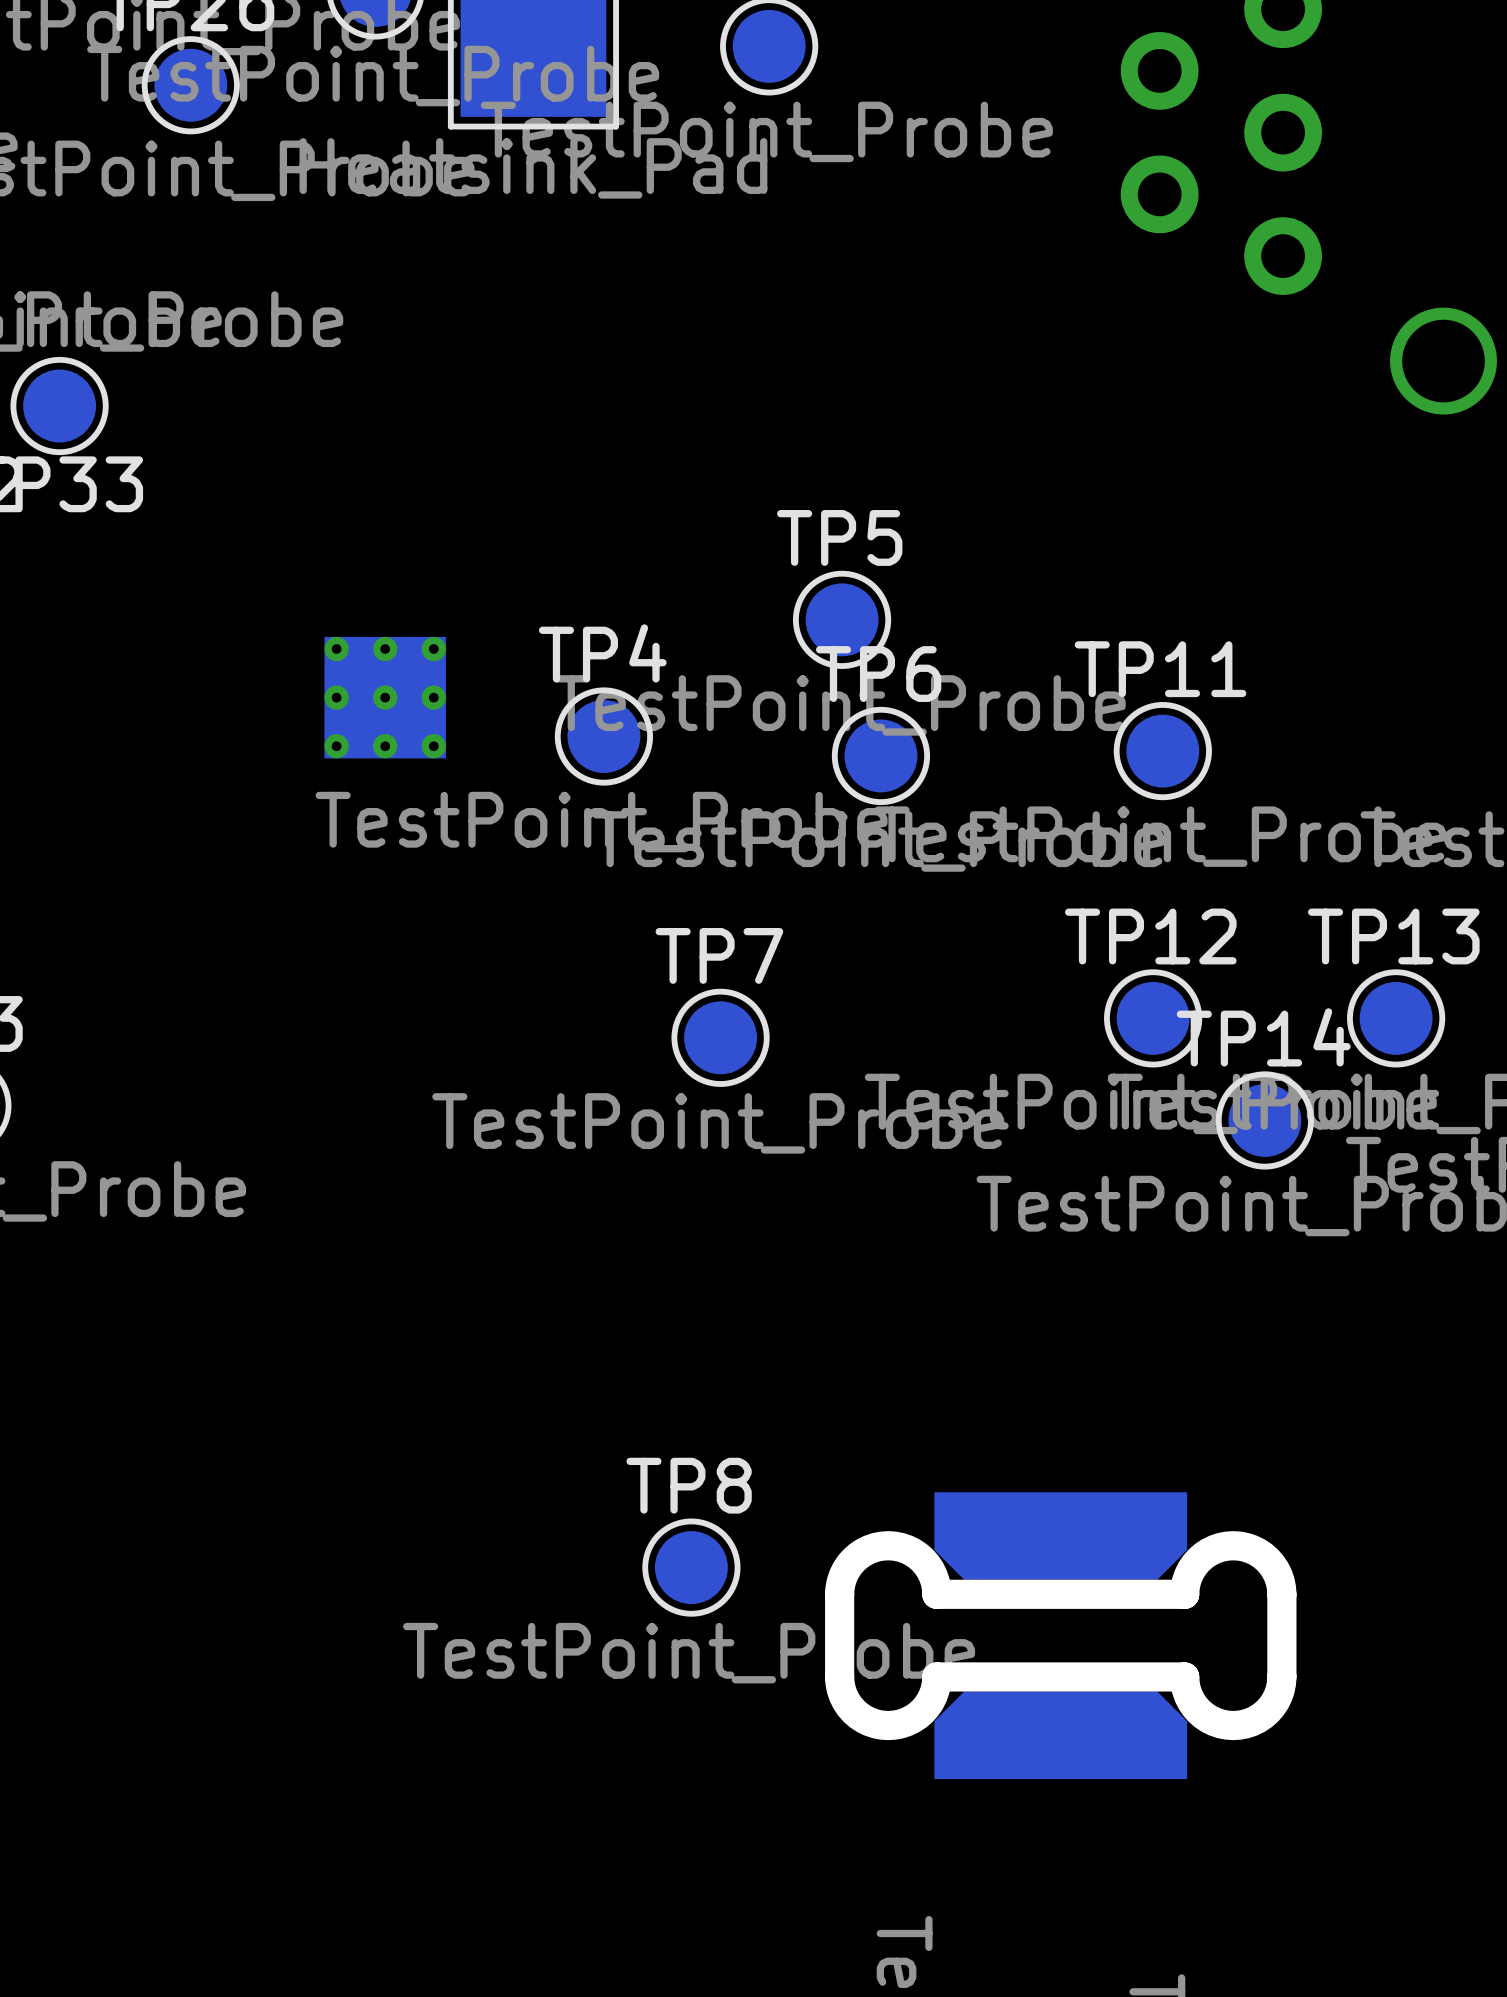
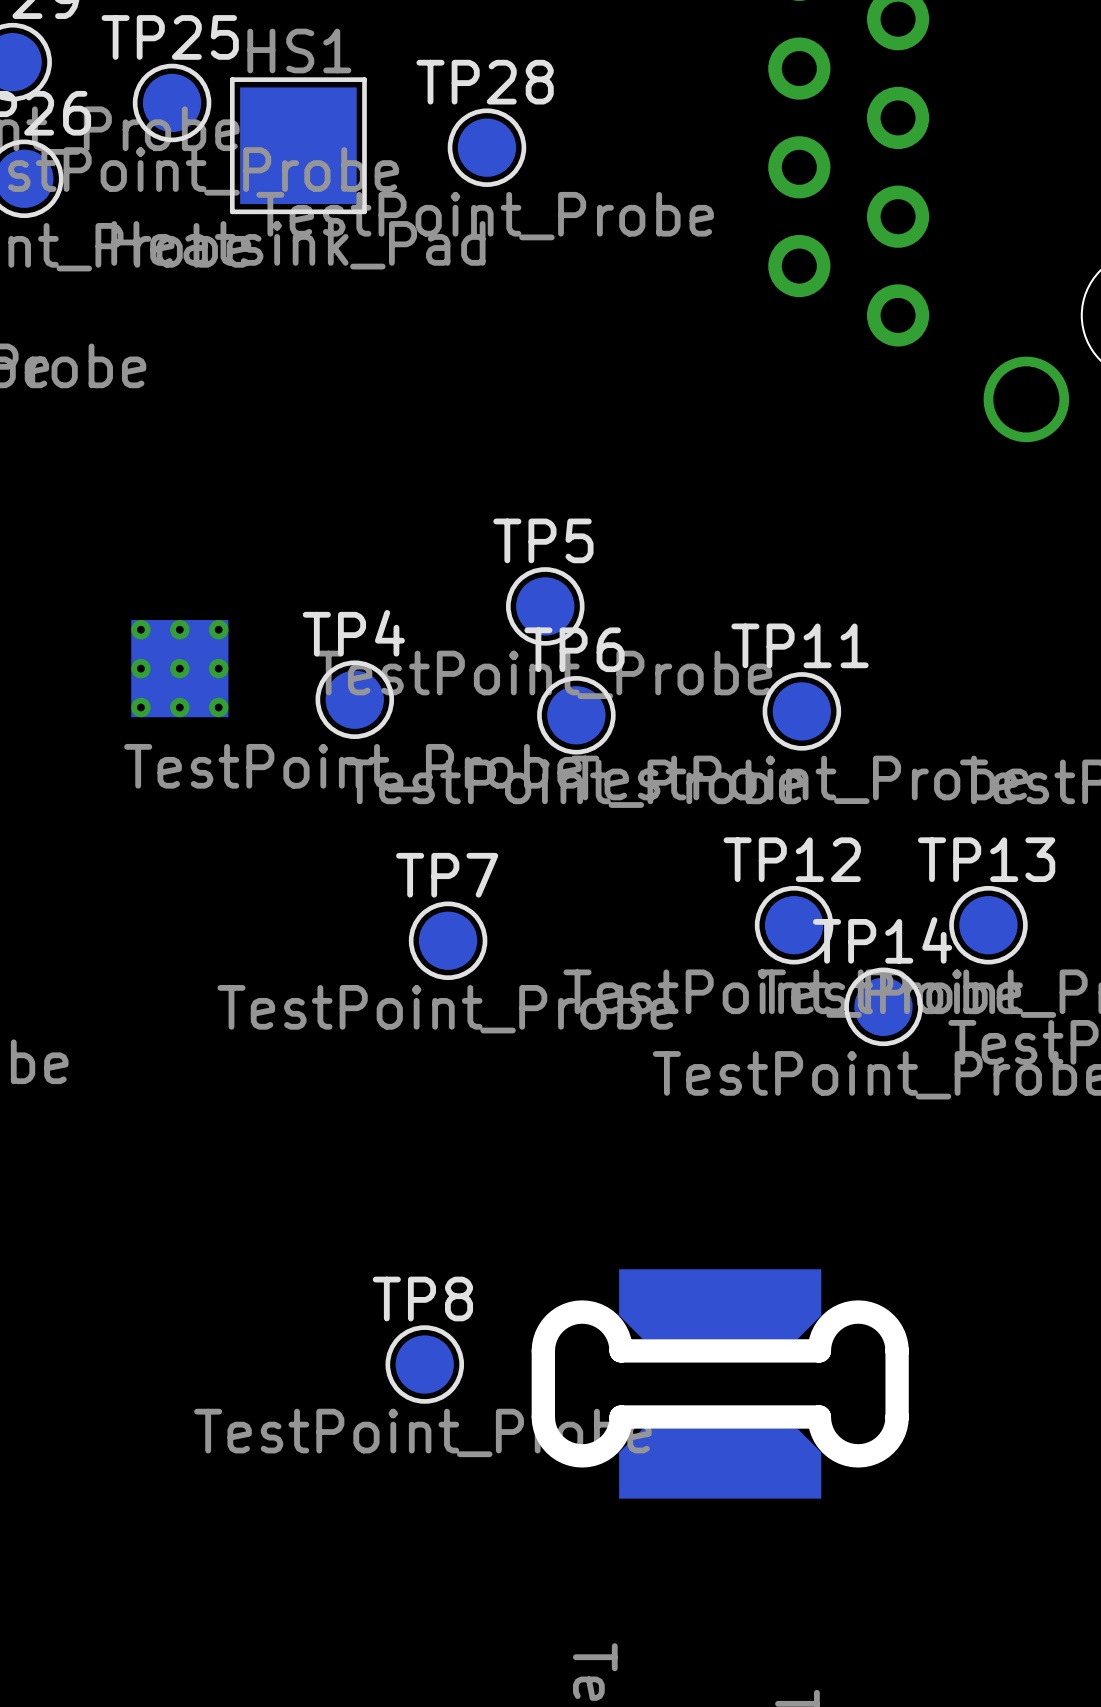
part position: (1060, 1635) -> (720, 1383)

